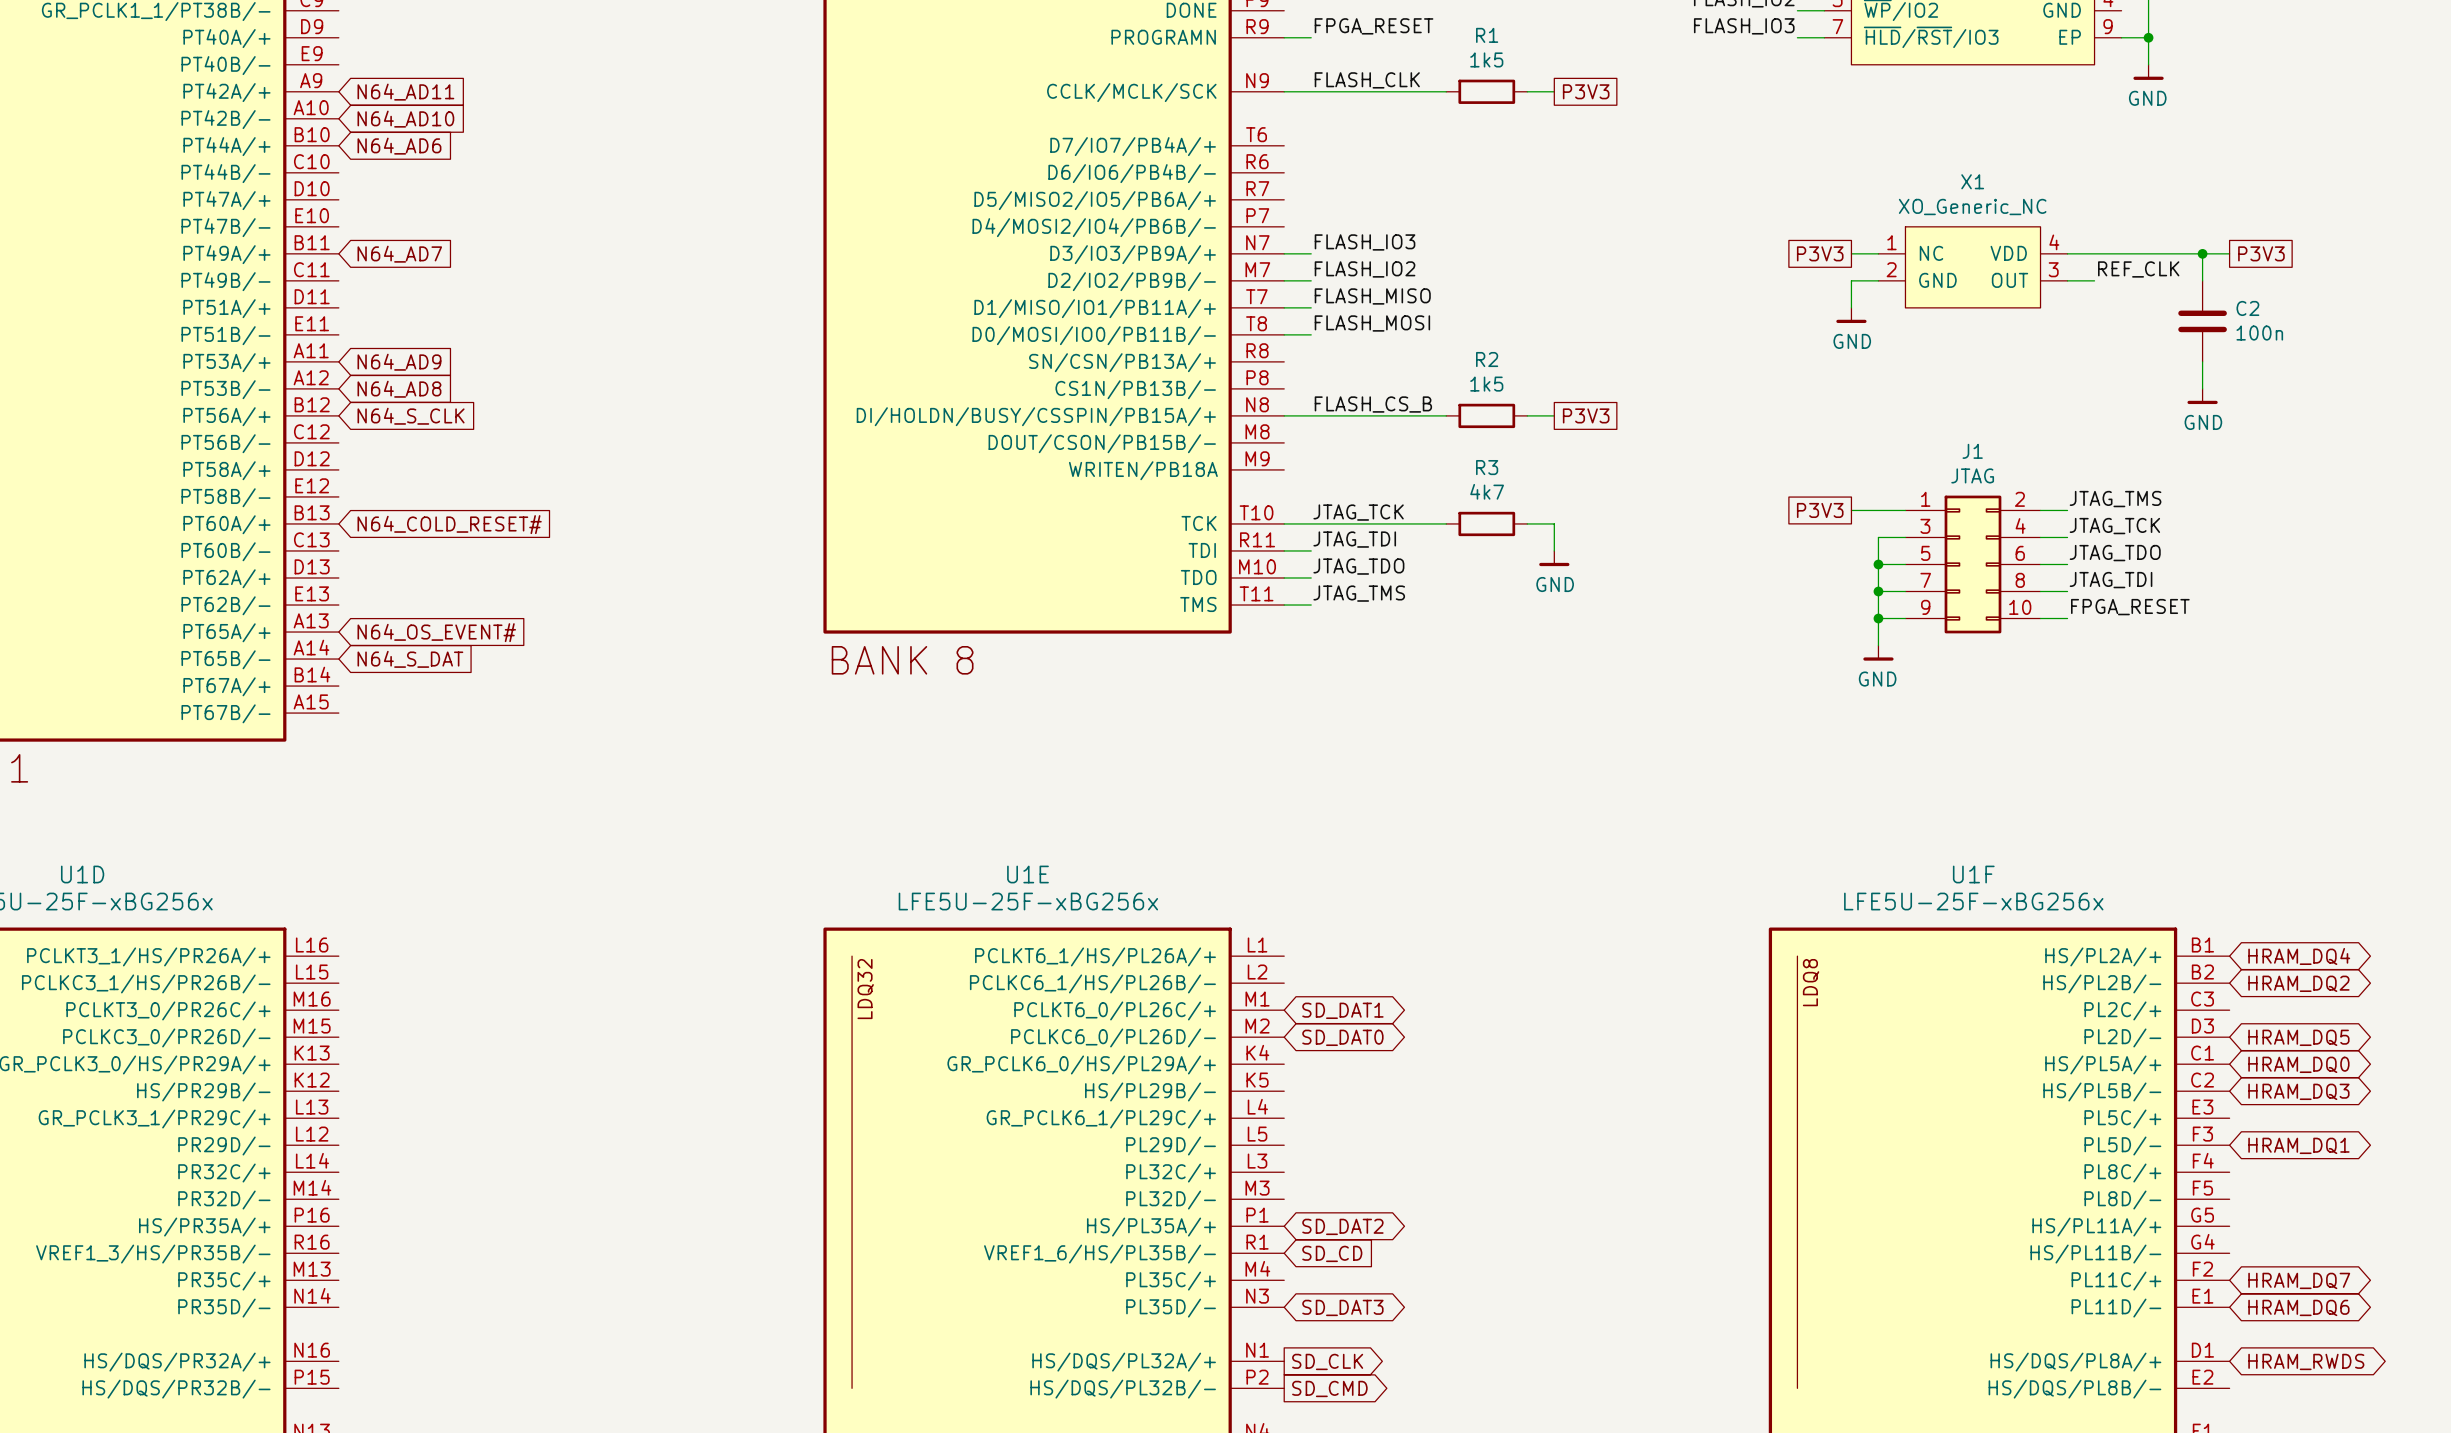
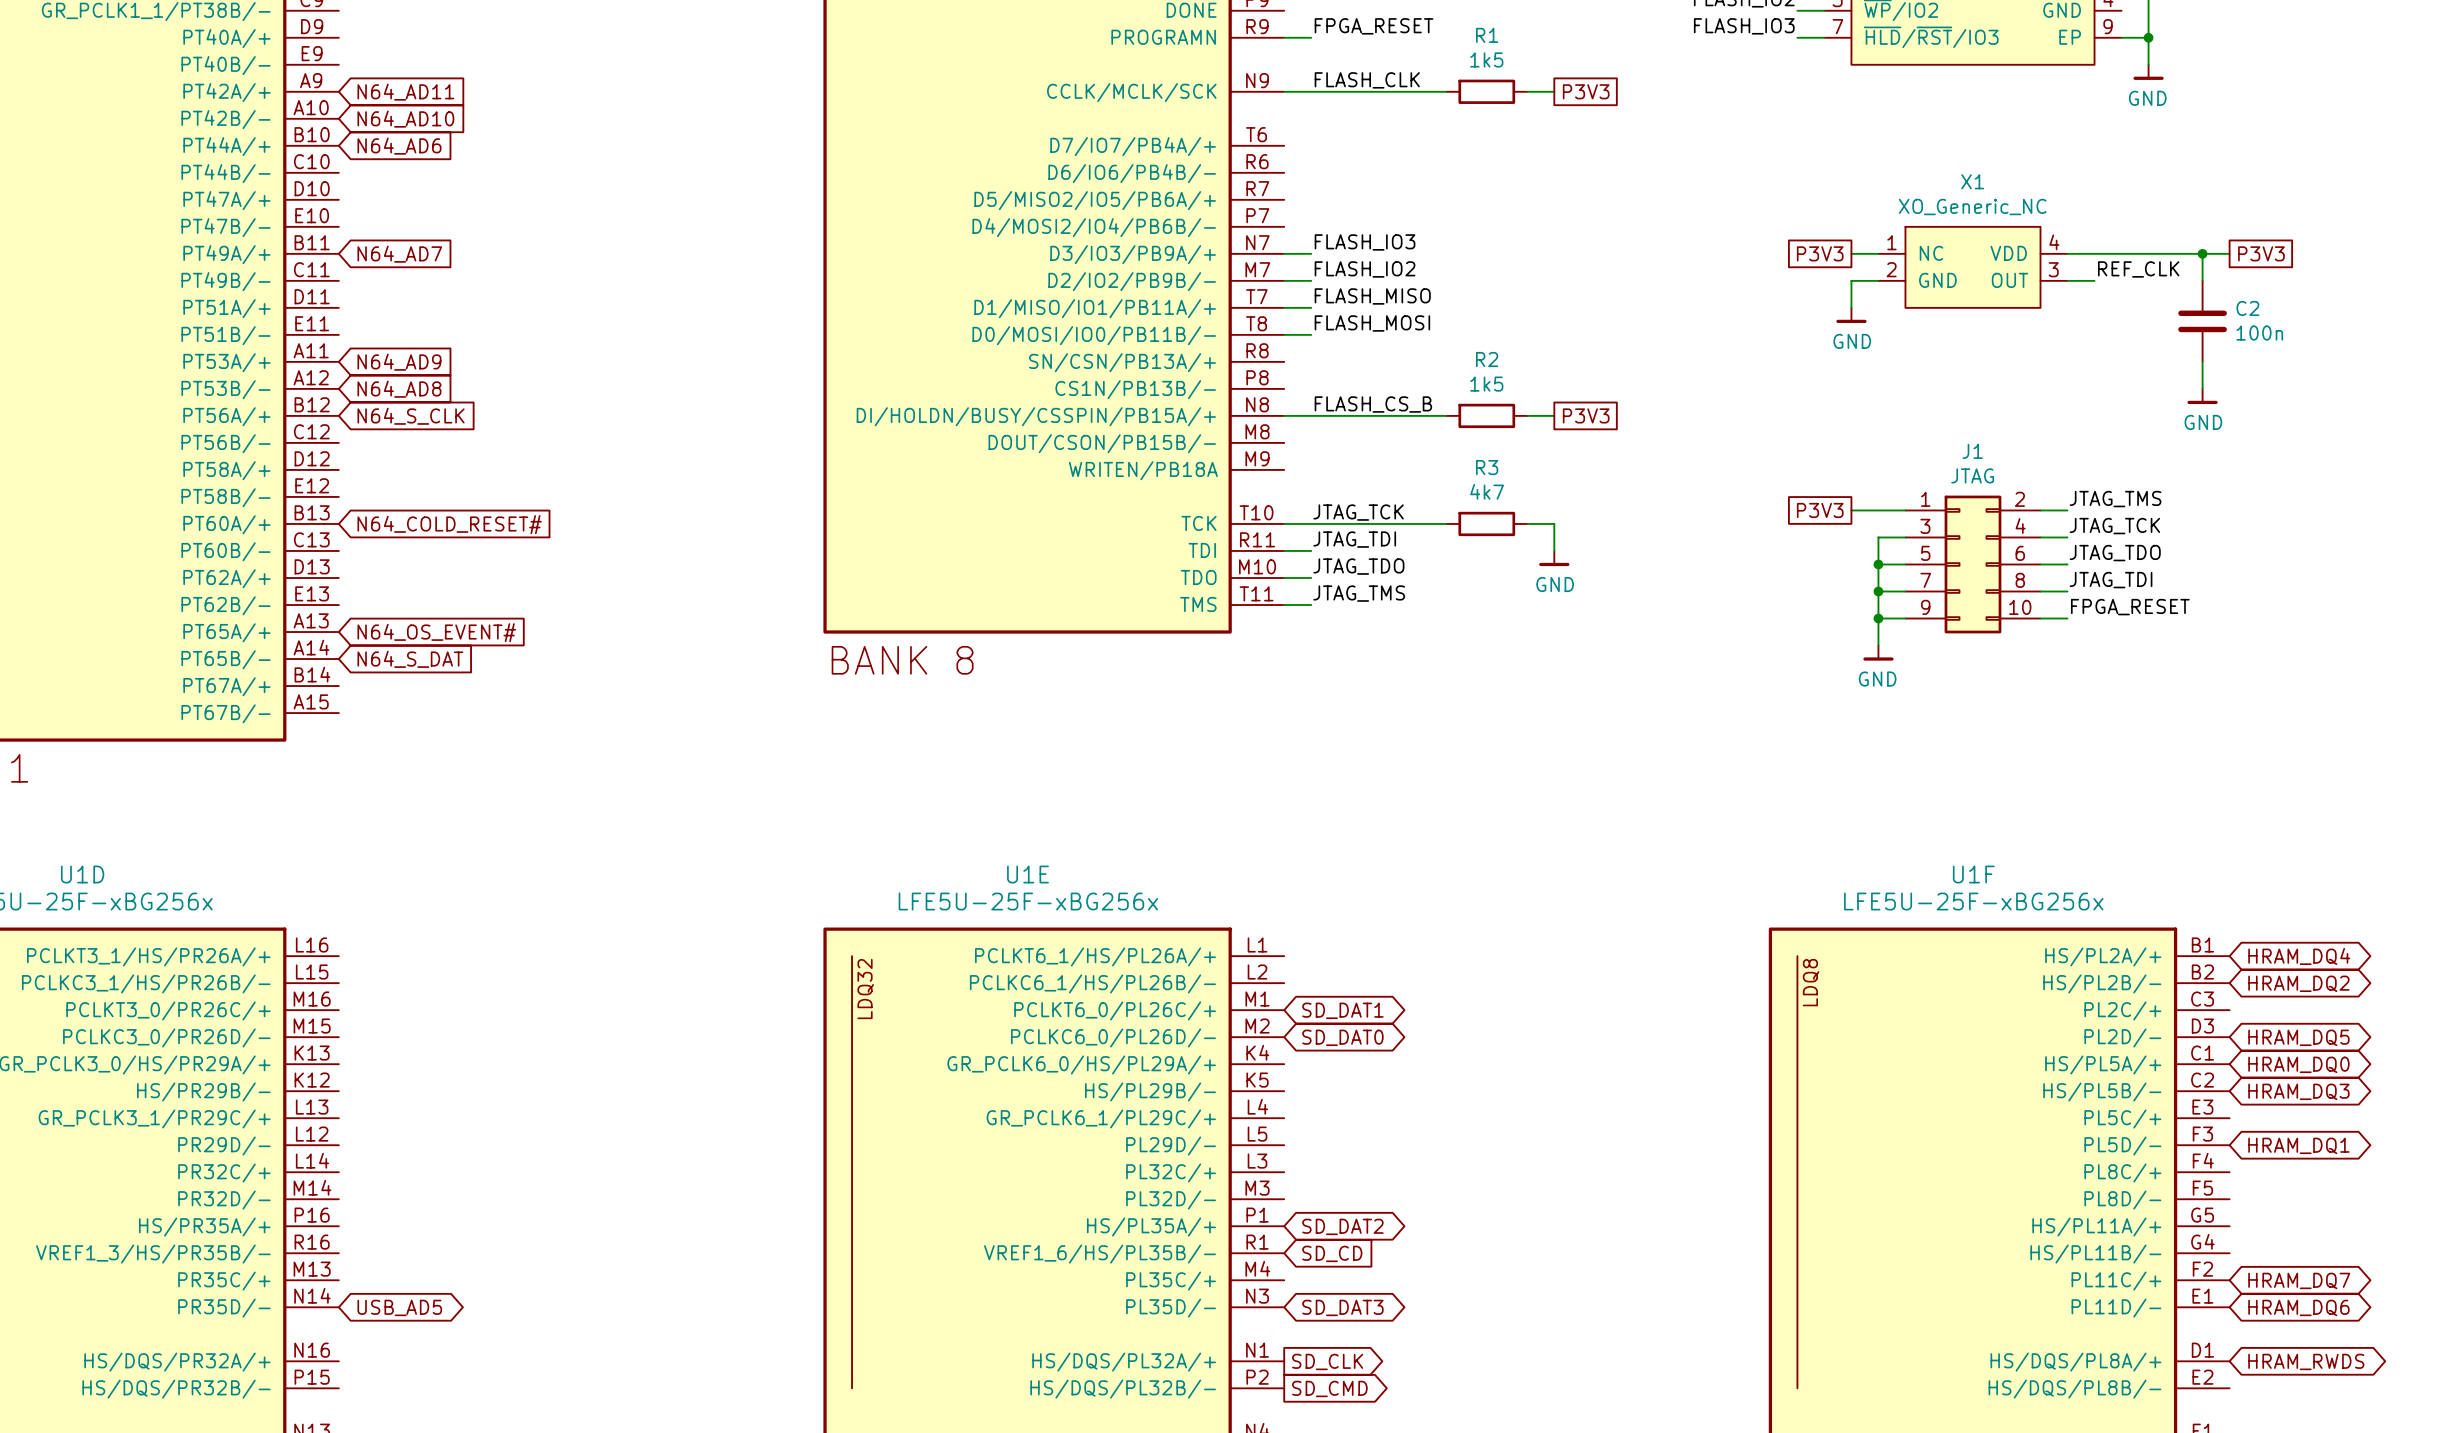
global label: none -> USB_AD5 (399, 1307)

